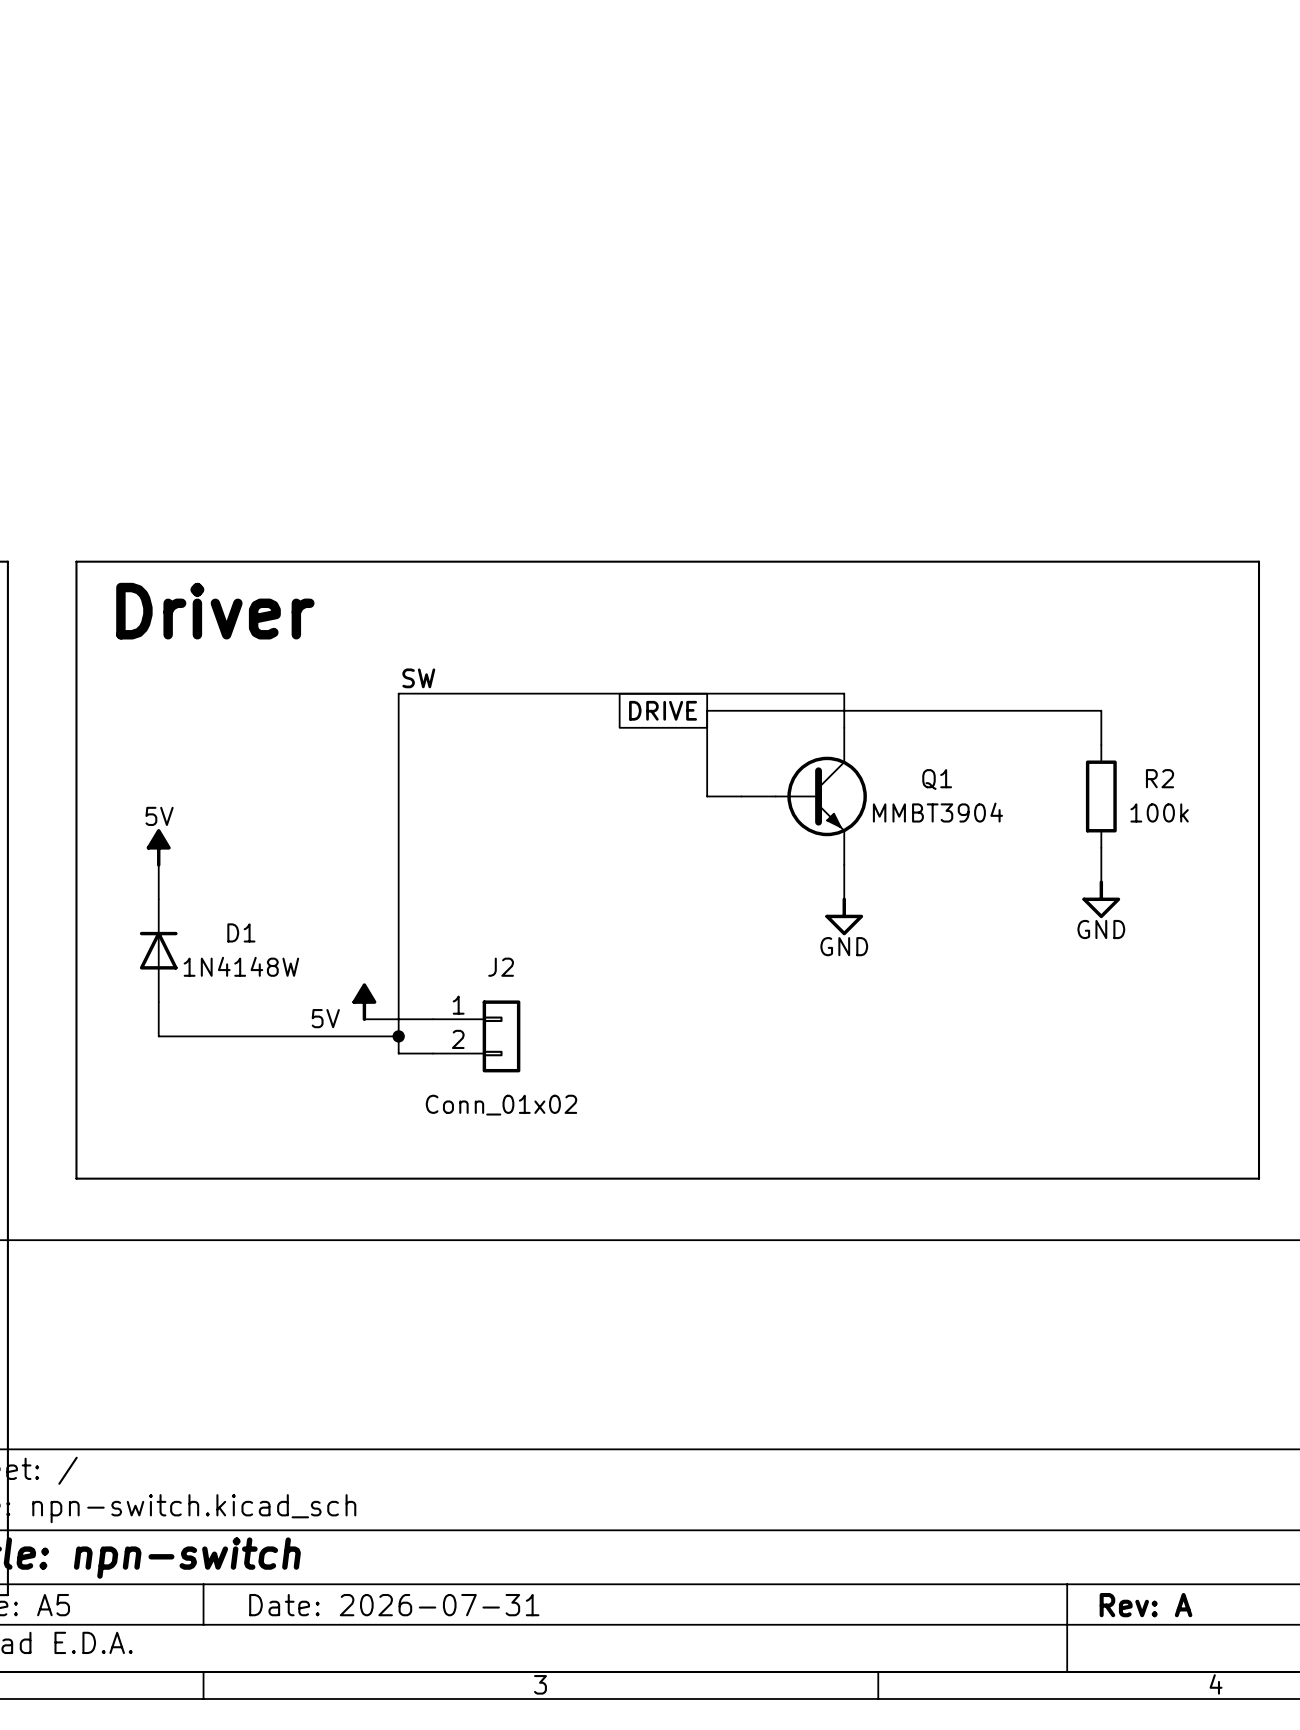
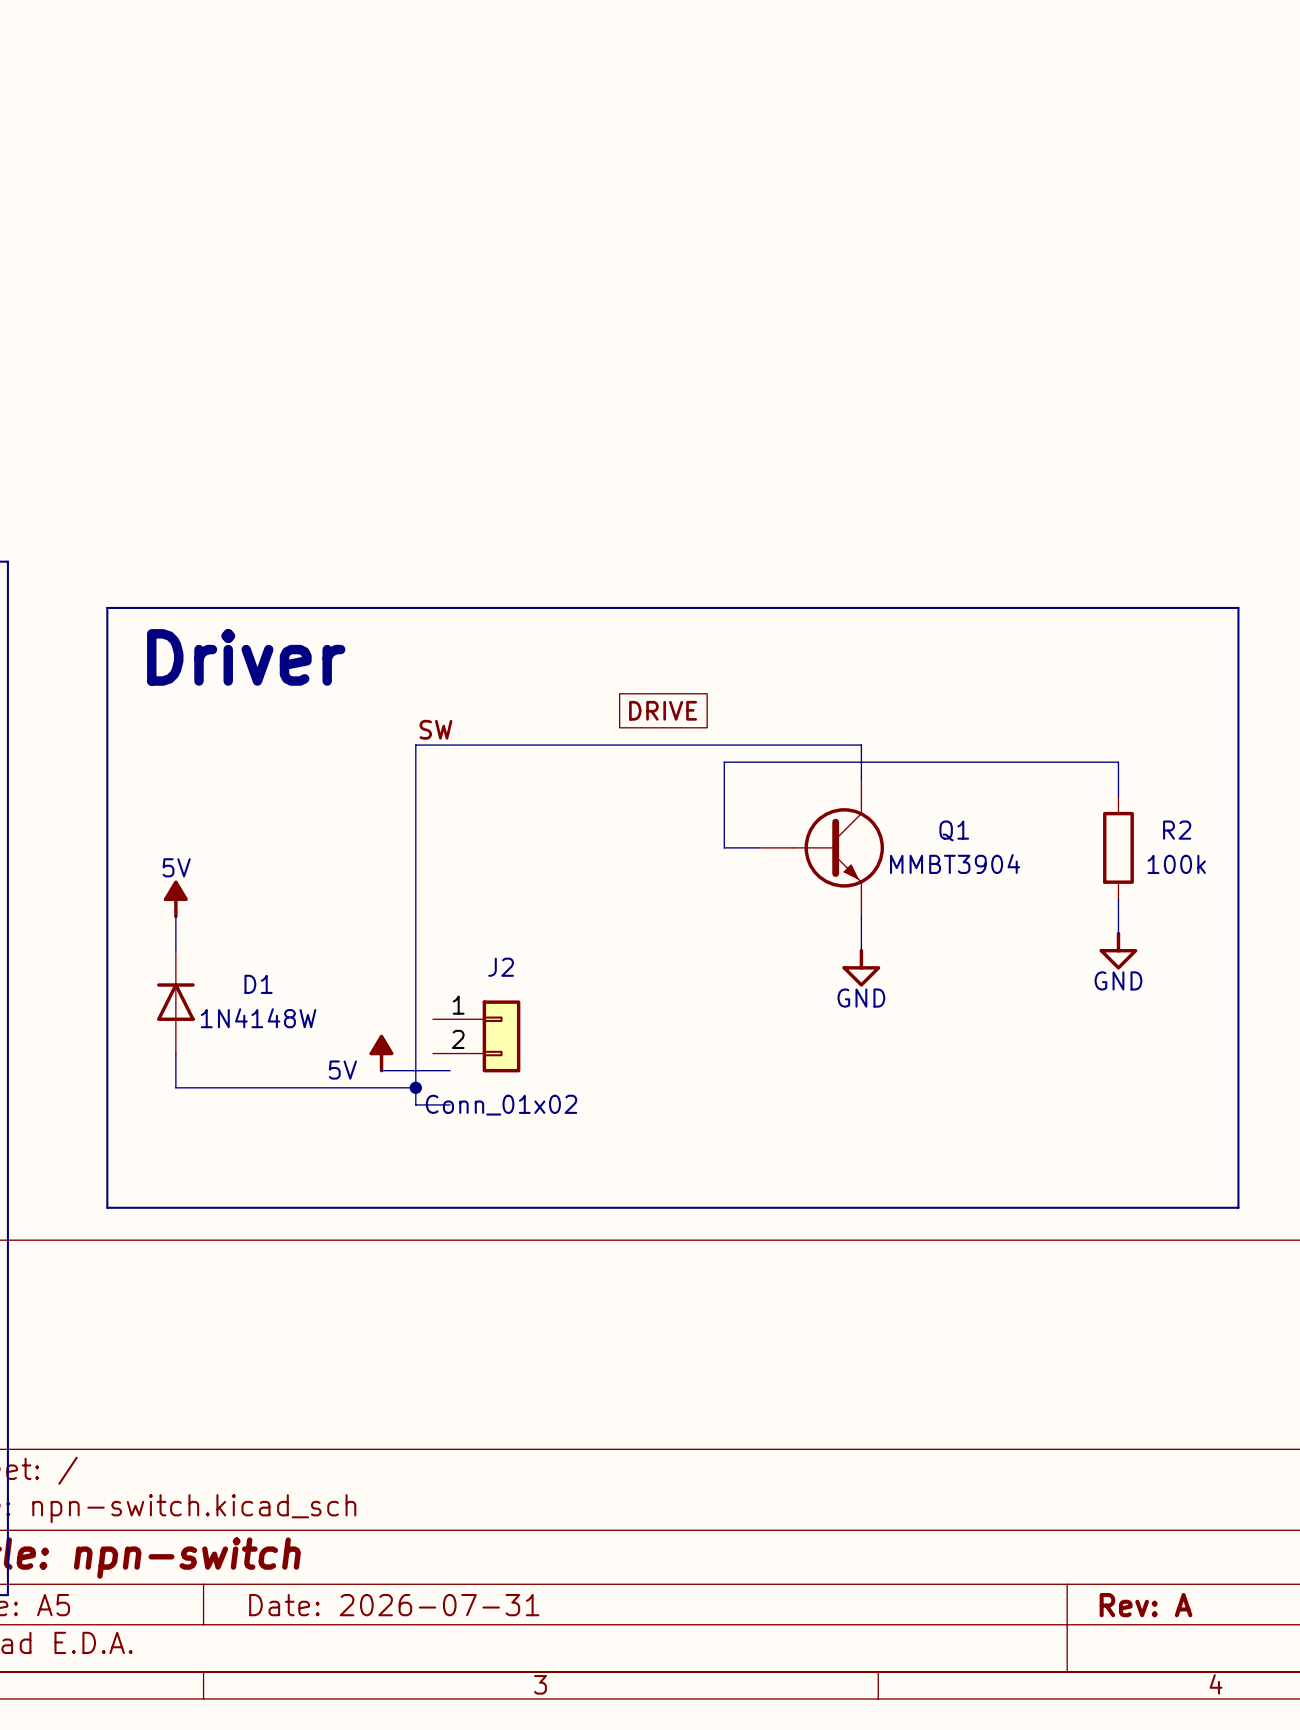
line: (76, 561) (1259, 561) (1259, 1178) (76, 1178) (76, 561) -> (107, 607) (107, 1207) (1238, 1207) (1238, 607) (107, 607)
text position: Driver (215, 611) -> Driver (246, 657)
label position: SW (418, 678) -> SW (435, 729)
wire: (844, 727) (844, 693) (398, 693) (398, 1053) (432, 1053) -> (861, 779) (861, 745) (415, 745) (415, 1104) (450, 1104)
wire: (1101, 745) (1101, 710) (707, 710) (707, 796) (741, 796) -> (1118, 796) (1118, 762) (724, 762) (724, 847) (758, 847)
Q1 position: (804, 796) -> (821, 847)
R2 position: (1101, 796) -> (1118, 847)
power symbol position: 5V (158, 847) -> 5V (175, 899)
wire: (1101, 847) (1101, 882) -> (1118, 899) (1118, 933)
wire: (158, 865) (158, 899) -> (175, 916) (175, 950)
wire: (844, 865) (844, 899) -> (861, 916) (861, 950)
power symbol position: GND (1101, 899) -> GND (1118, 950)
power symbol position: GND (844, 916) -> GND (861, 967)
D1 position: (158, 950) -> (175, 1002)
wire: (158, 1002) (158, 1036) (398, 1036) -> (175, 1053) (175, 1087) (415, 1087)
power symbol position: 5V (364, 1002) -> 5V (381, 1053)
wire: (364, 1019) (432, 1019) -> (381, 1070) (450, 1070)
junction position: (398, 1036) -> (415, 1087)

